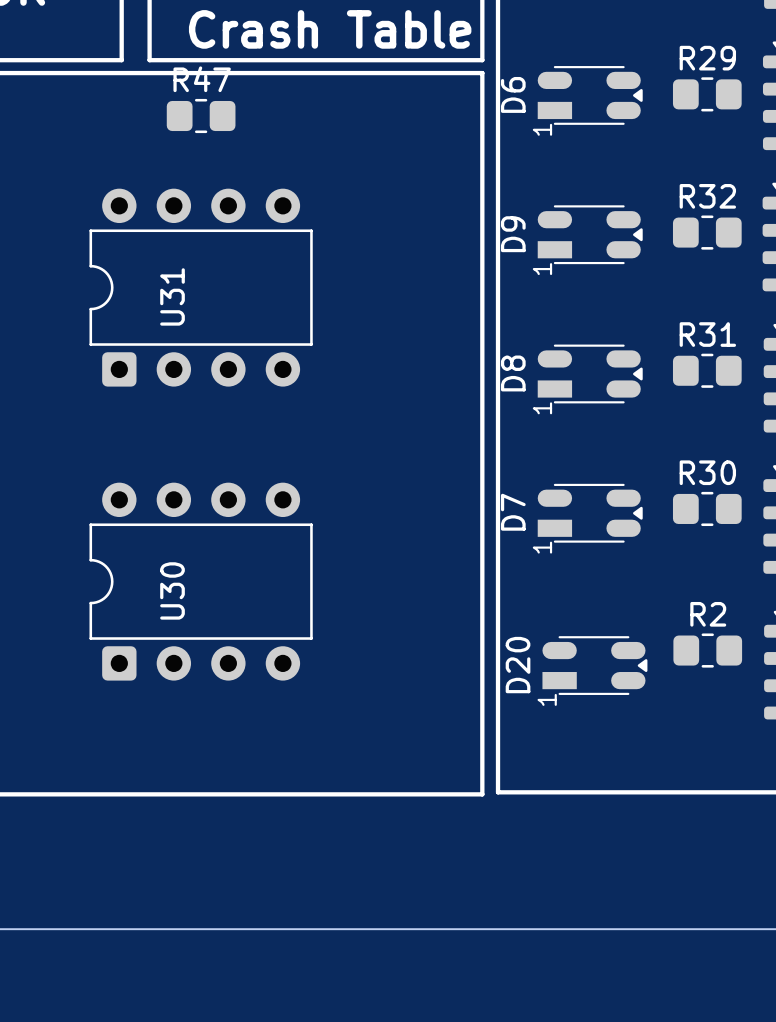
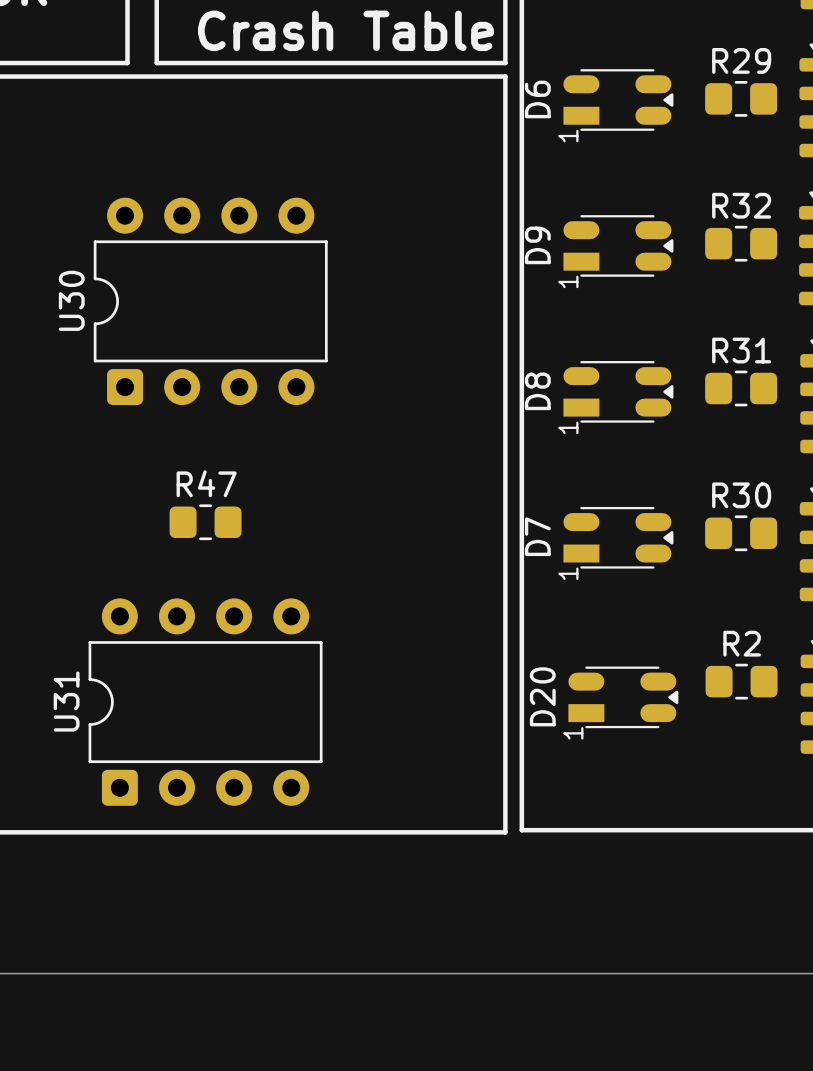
R47 position: (201, 116) -> (205, 522)
U31 name: U31 (172, 296) -> U30 (71, 300)
U30: (201, 581) -> none
U31: none -> (205, 702)

